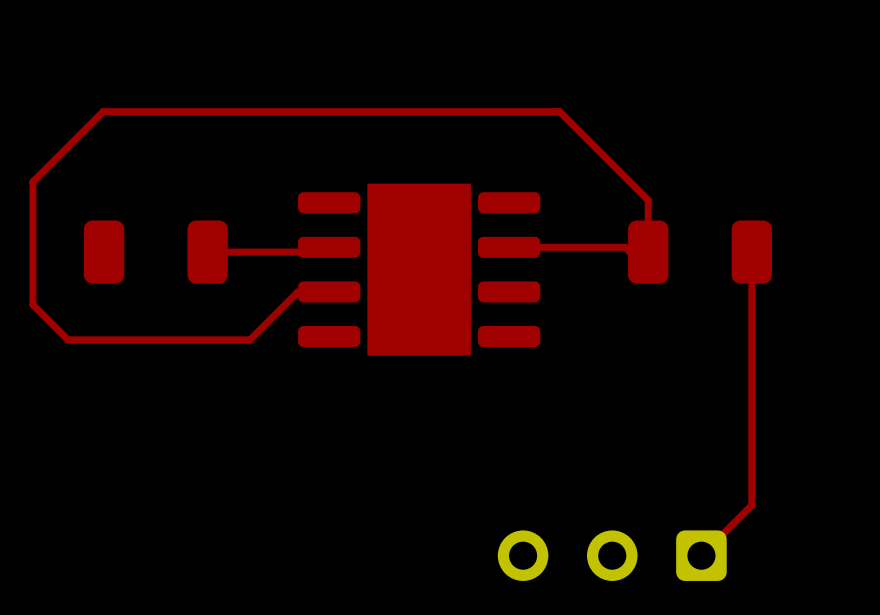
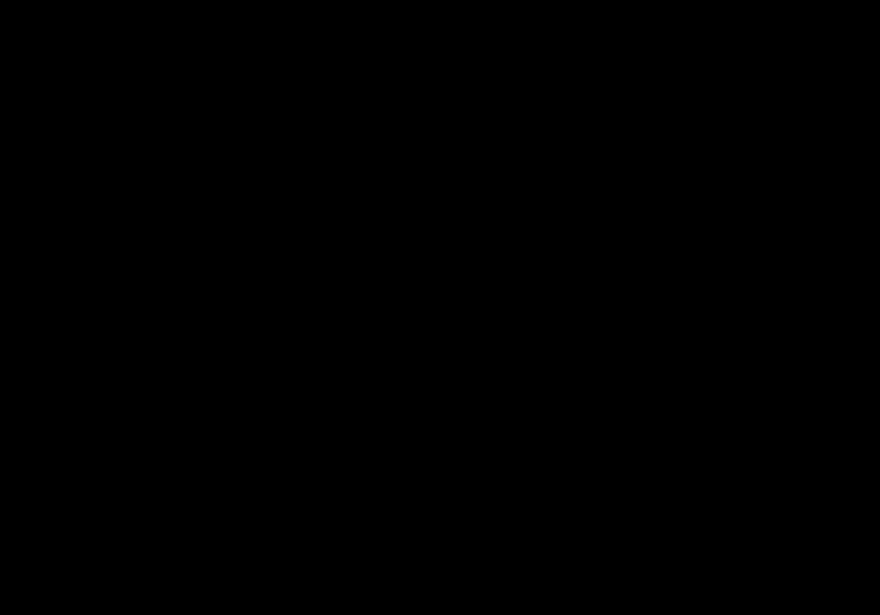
top track: (329, 247) (324, 252) (207, 252) -> none
top track: (509, 247) (625, 247) (629, 252) (648, 252) (648, 200) (559, 111) (103, 111) (32, 181) (32, 304) (68, 339) (250, 339) (298, 291) (329, 291) -> none
part: (155, 252) -> none
part: (700, 252) -> none
top track: (751, 252) (751, 505) (701, 555) -> none
part: (419, 269) -> none
part: (612, 555) -> none

